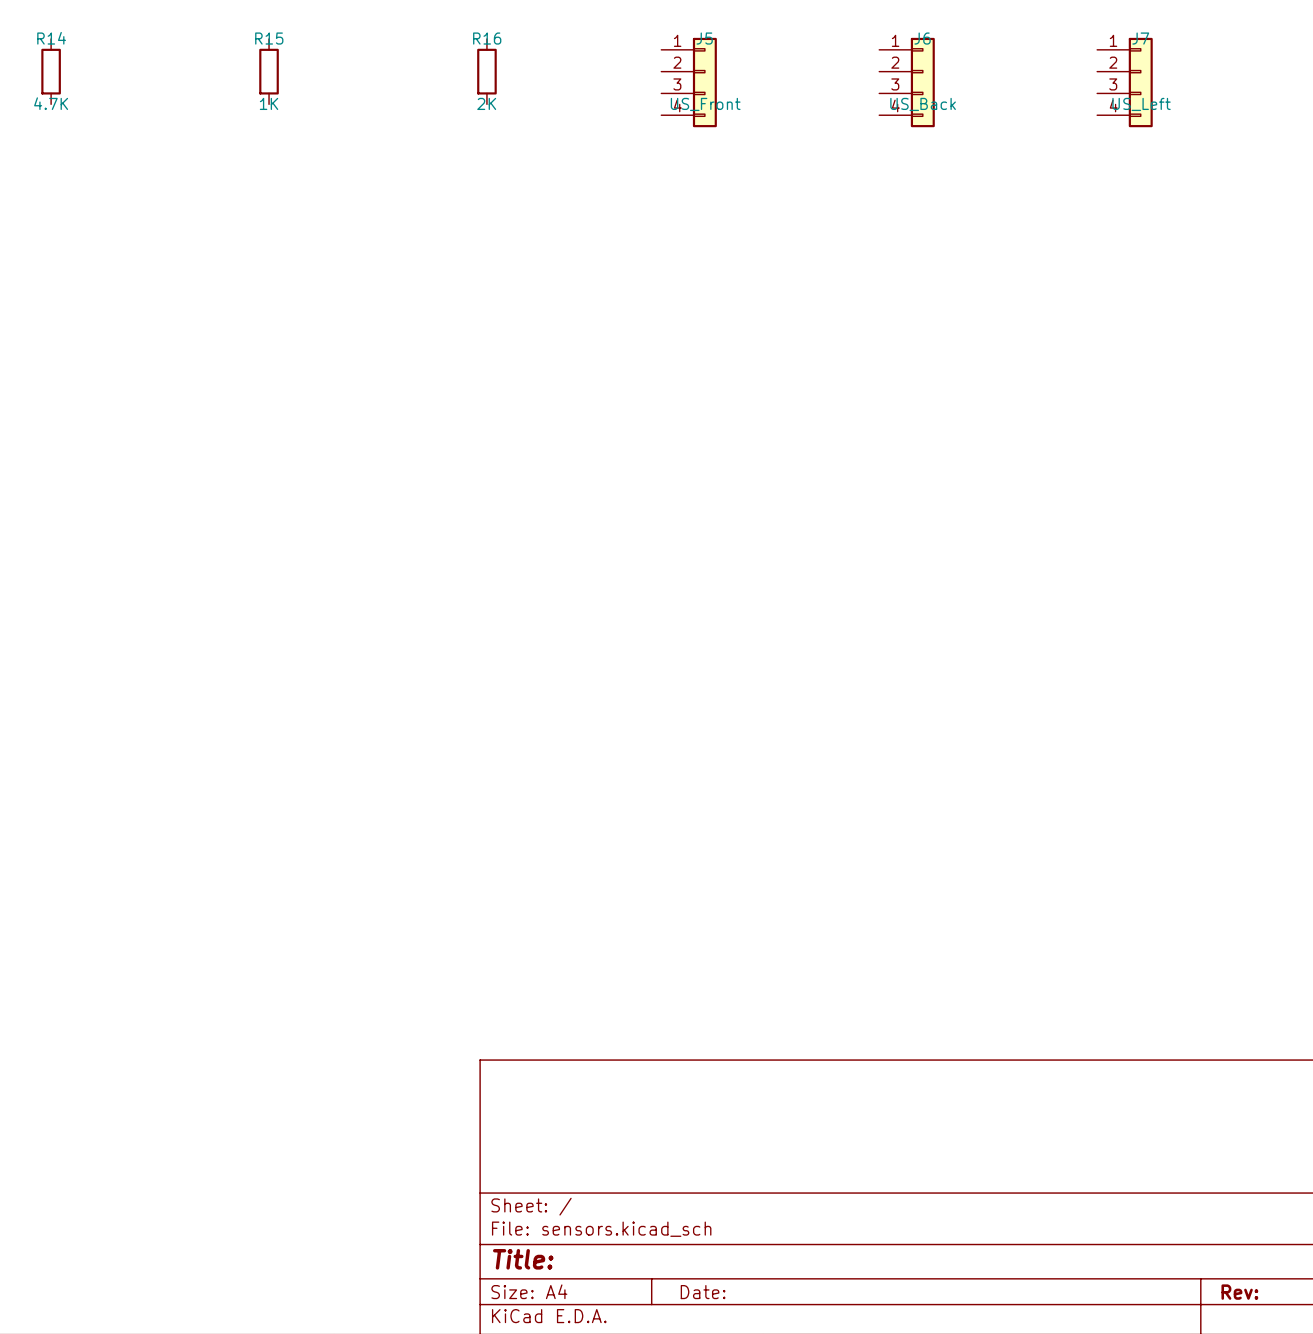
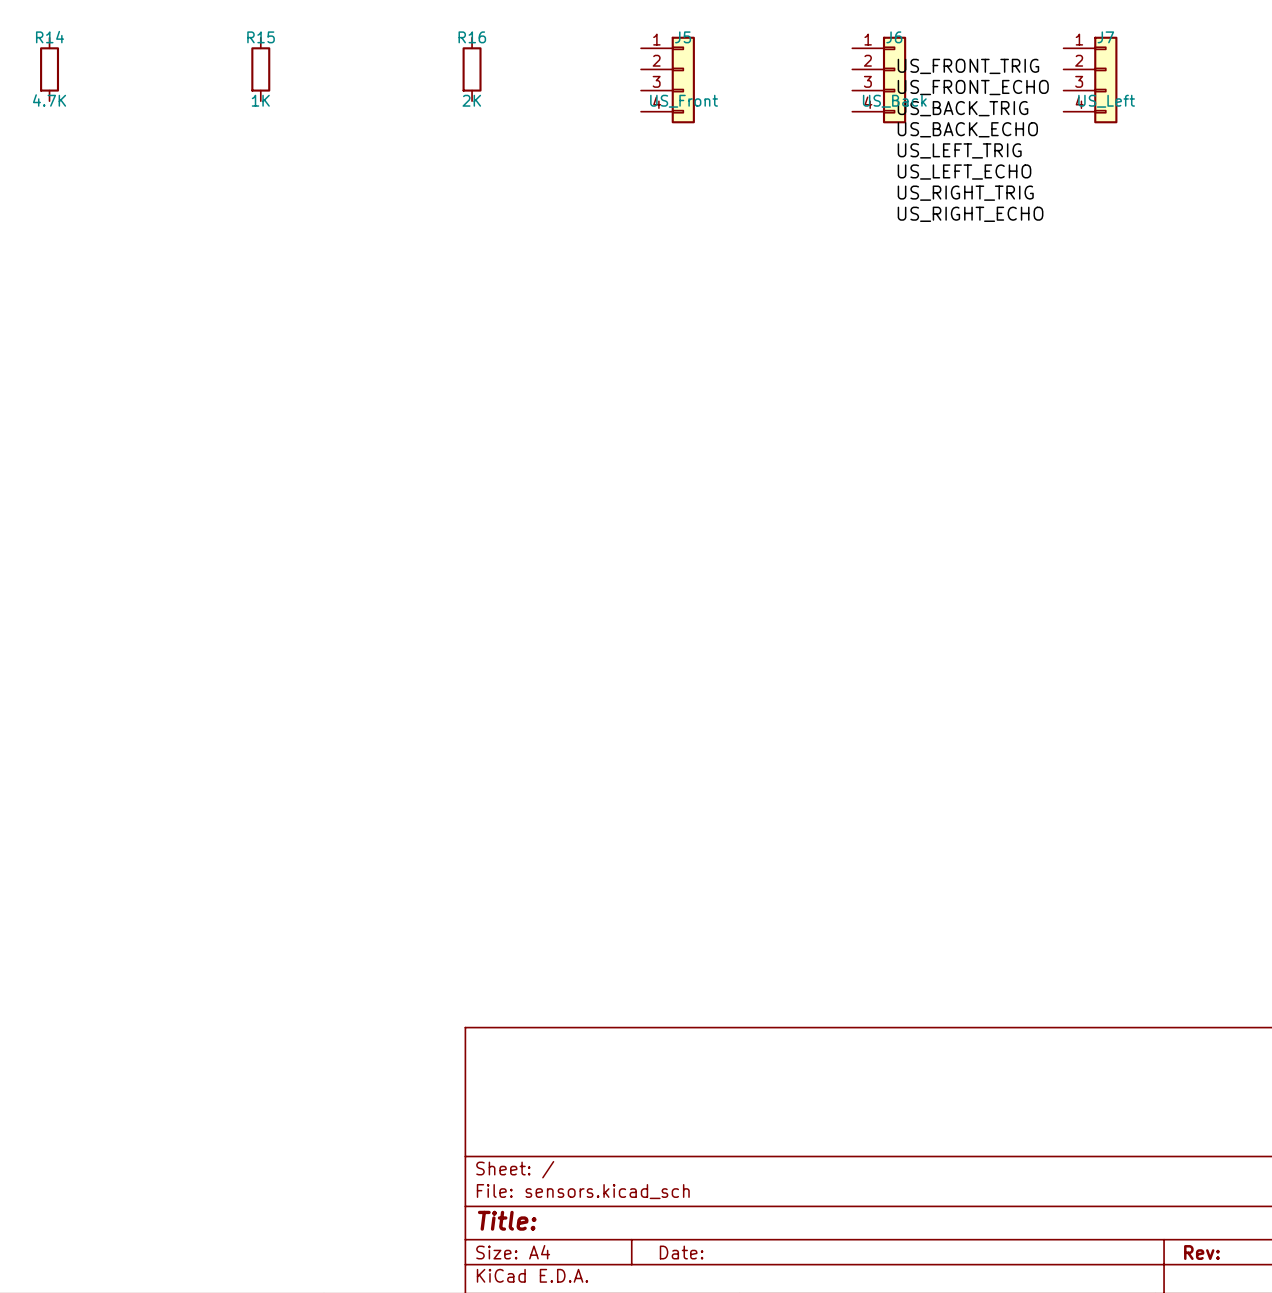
label: none -> US_FRONT_TRIG (968, 66)
label: none -> US_FRONT_ECHO (973, 87)
label: none -> US_BACK_TRIG (963, 108)
label: none -> US_BACK_ECHO (967, 129)
label: none -> US_LEFT_TRIG (959, 150)
label: none -> US_LEFT_ECHO (964, 172)
label: none -> US_RIGHT_TRIG (965, 193)
label: none -> US_RIGHT_ECHO (970, 214)

